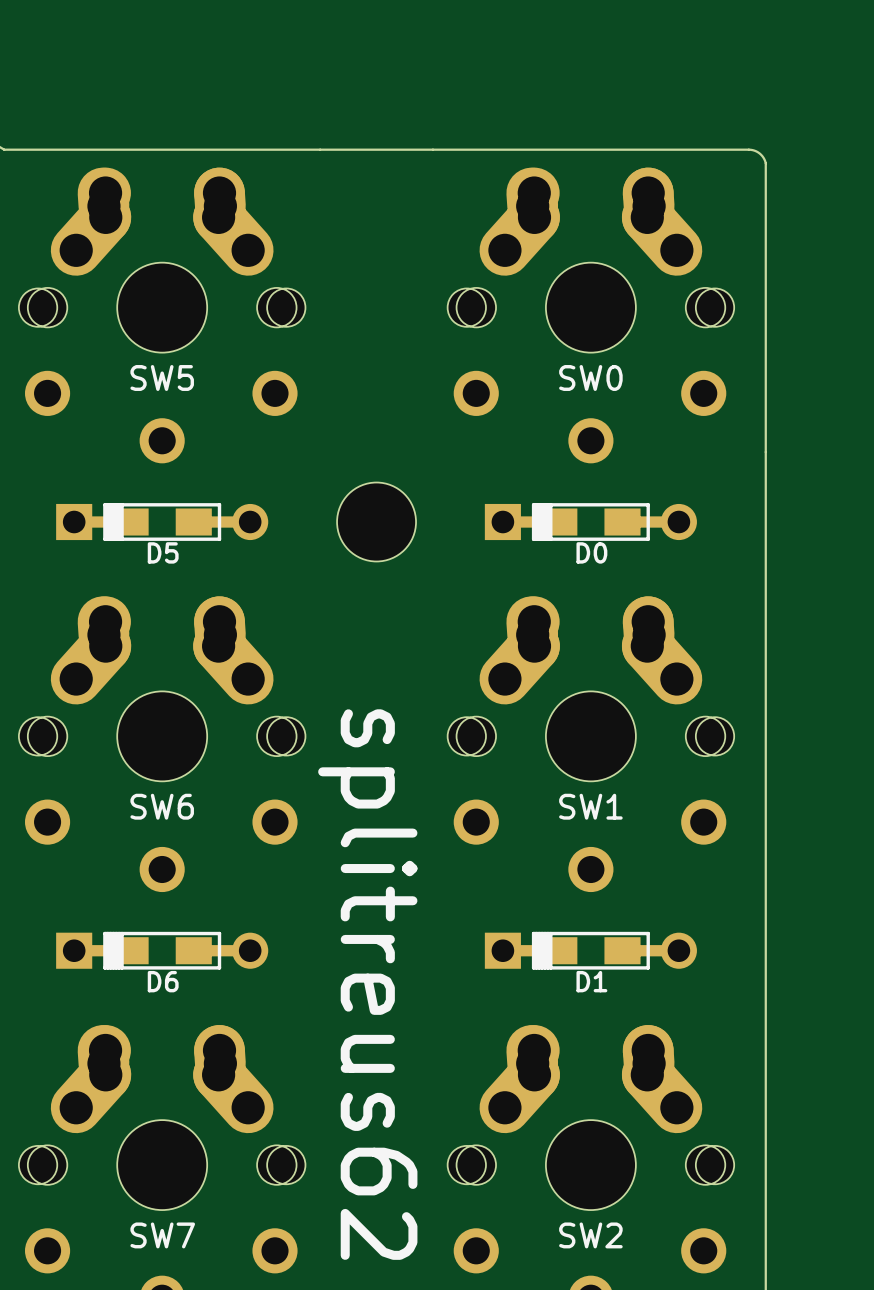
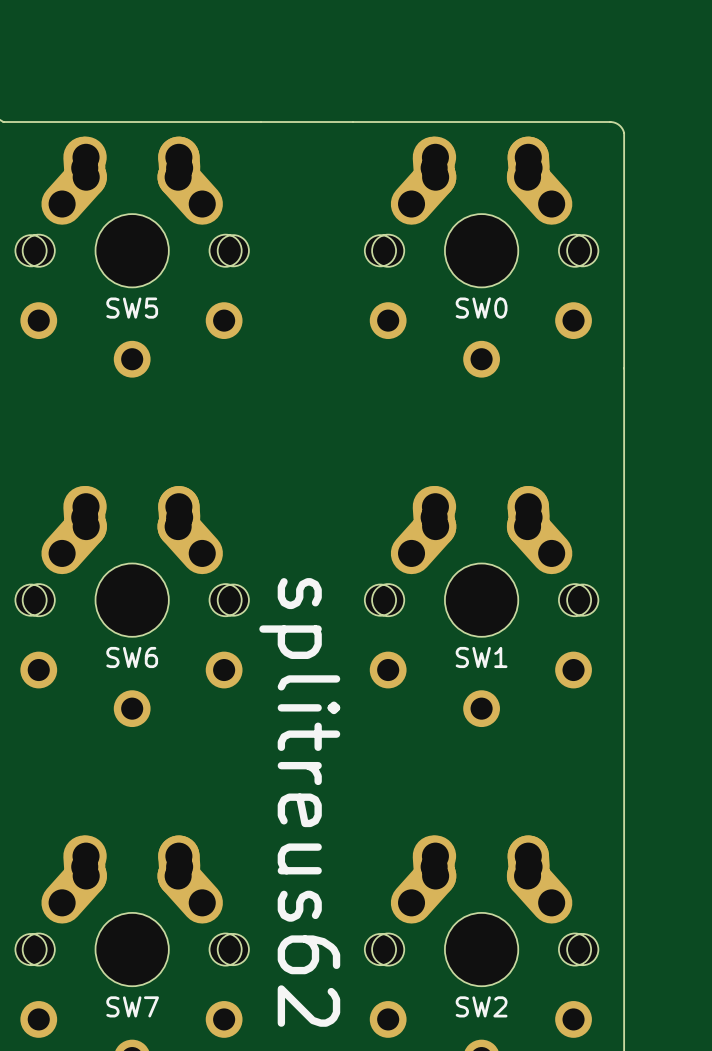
D5: (162, 522) -> none
part: (376, 522) -> none
D0: (590, 522) -> none
D6: (162, 950) -> none
D1: (590, 950) -> none

